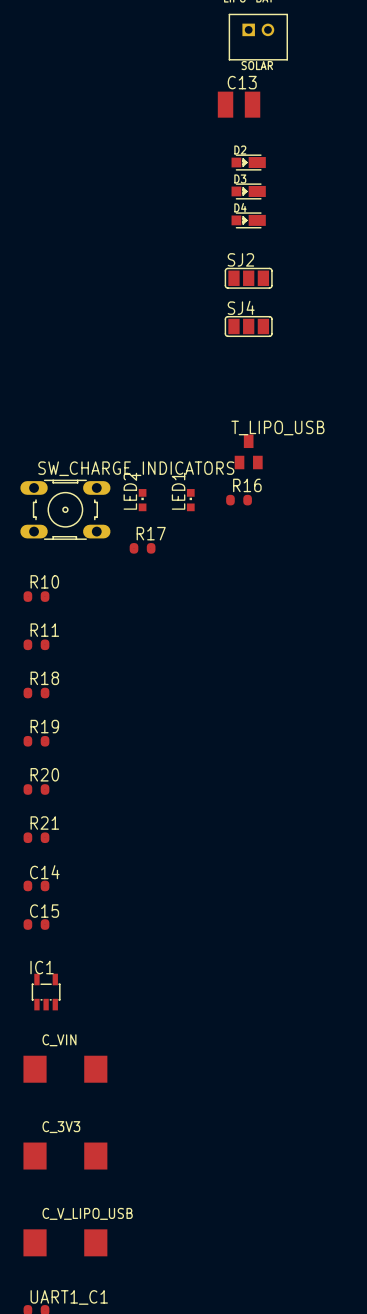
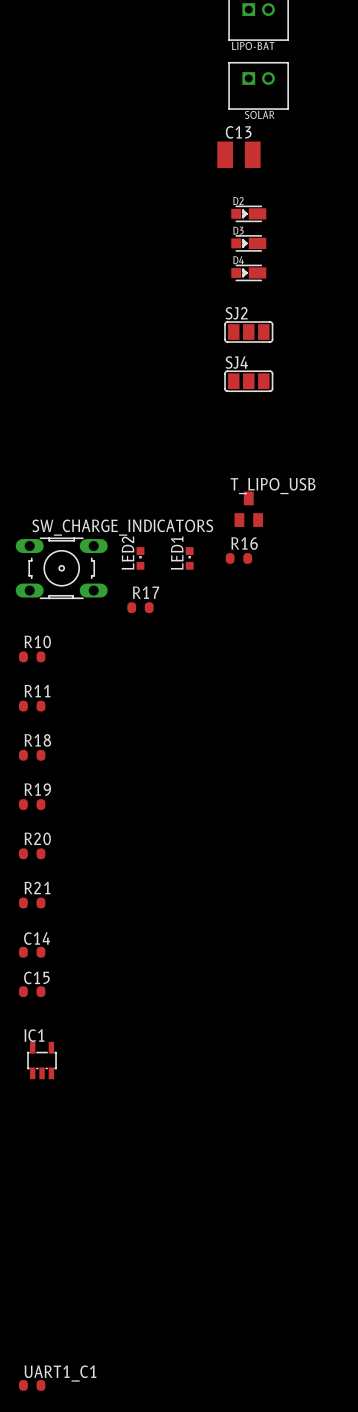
C_VIN: (65, 1069) -> none
C_3V3: (65, 1156) -> none
C_V_LIPO_USB: (65, 1242) -> none

